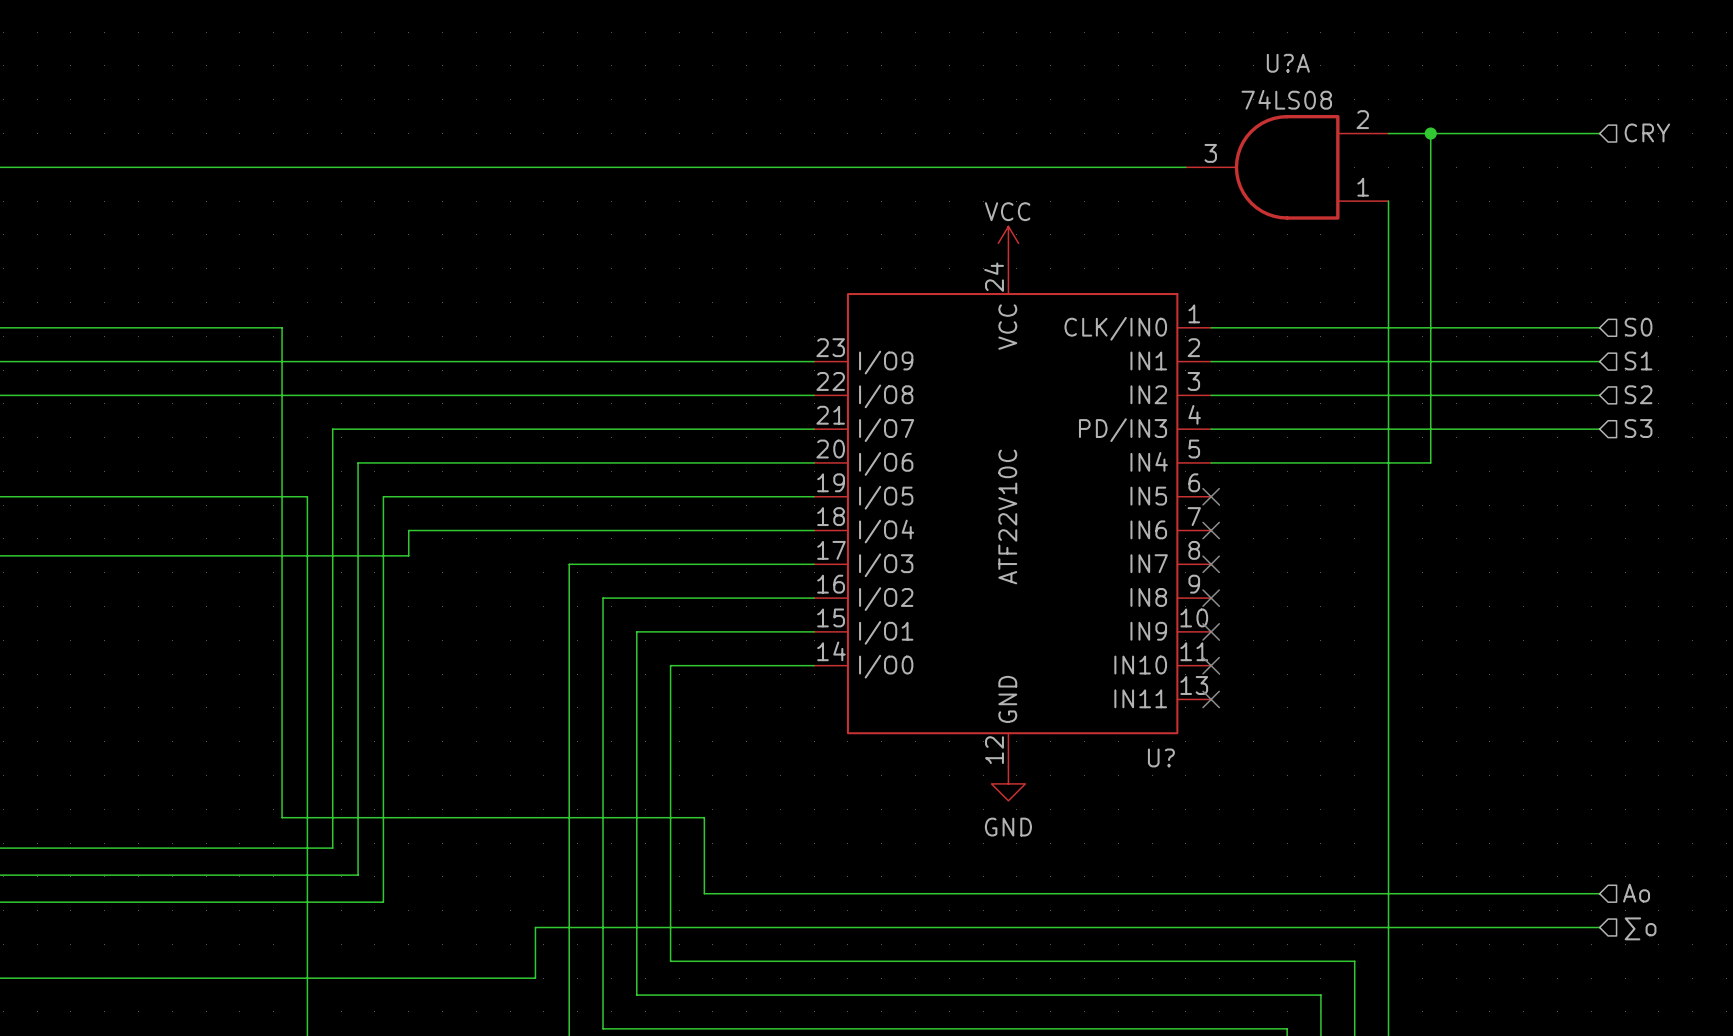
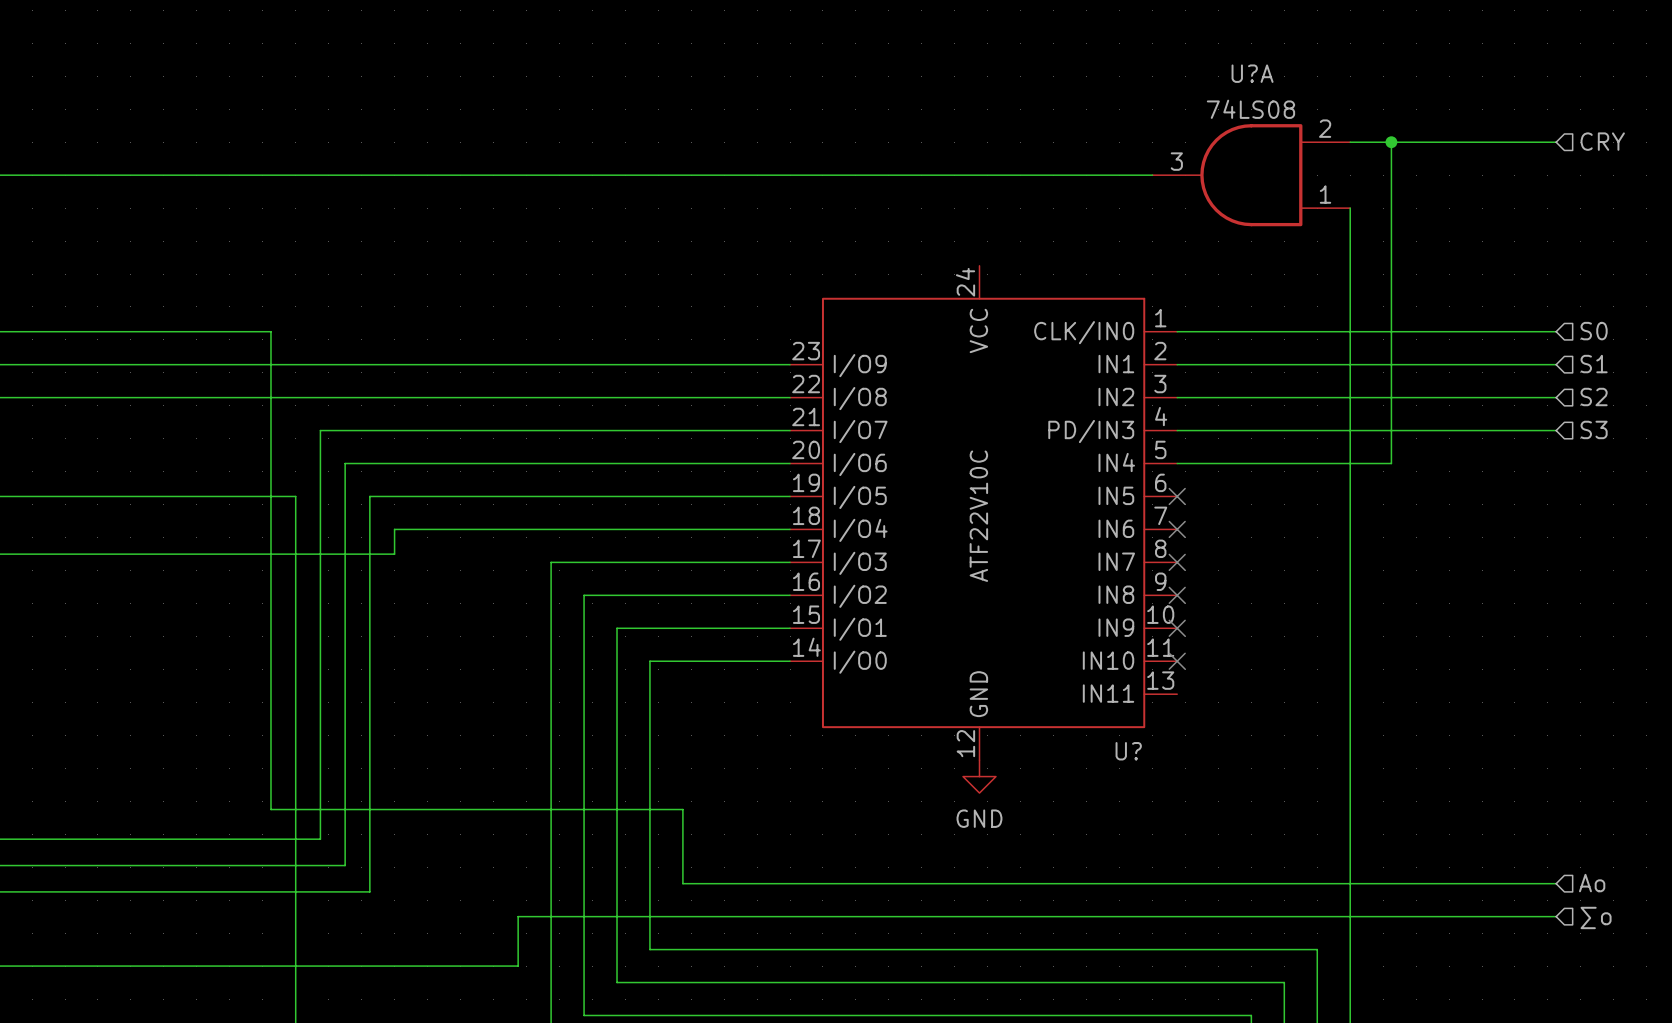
power symbol: VCC (1008, 243) -> none
no-connect mark: (1211, 699) -> none

